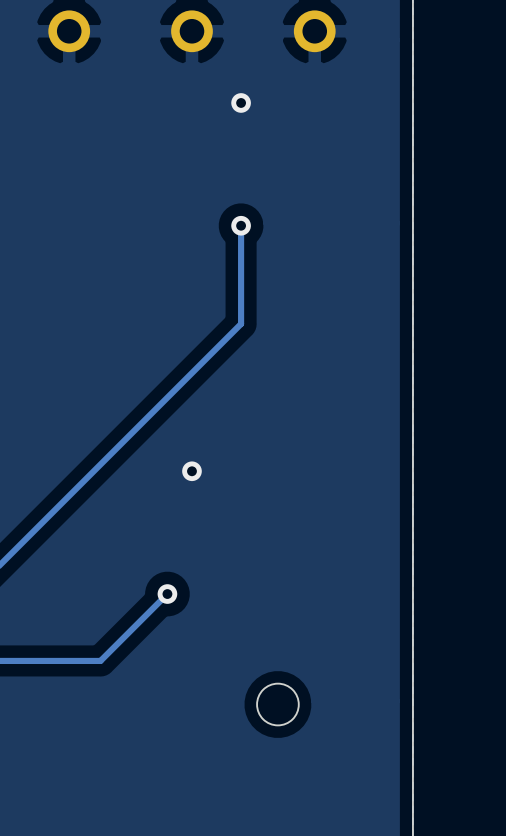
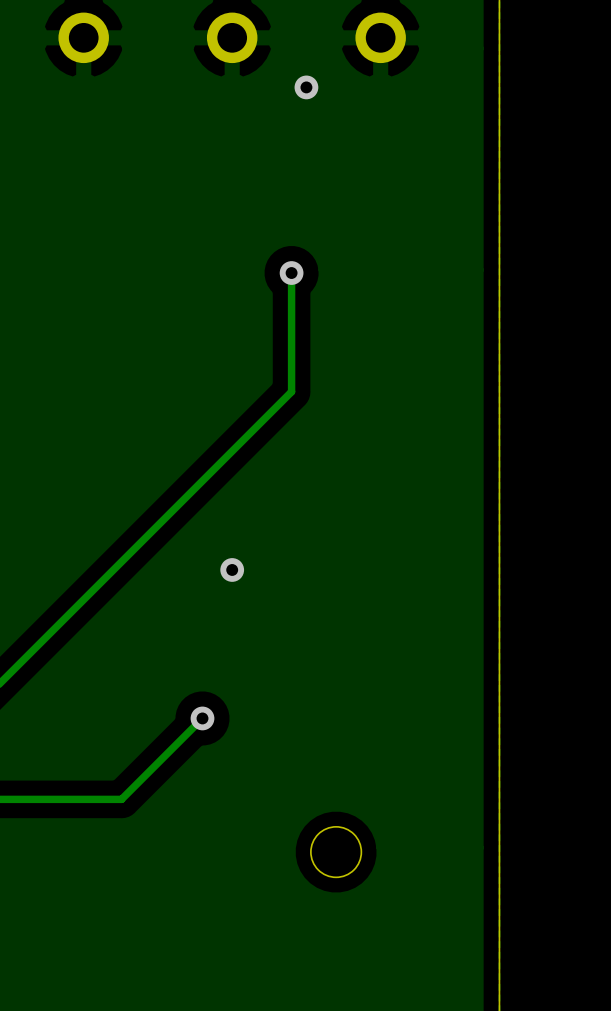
via position: (241, 102) -> (306, 87)

